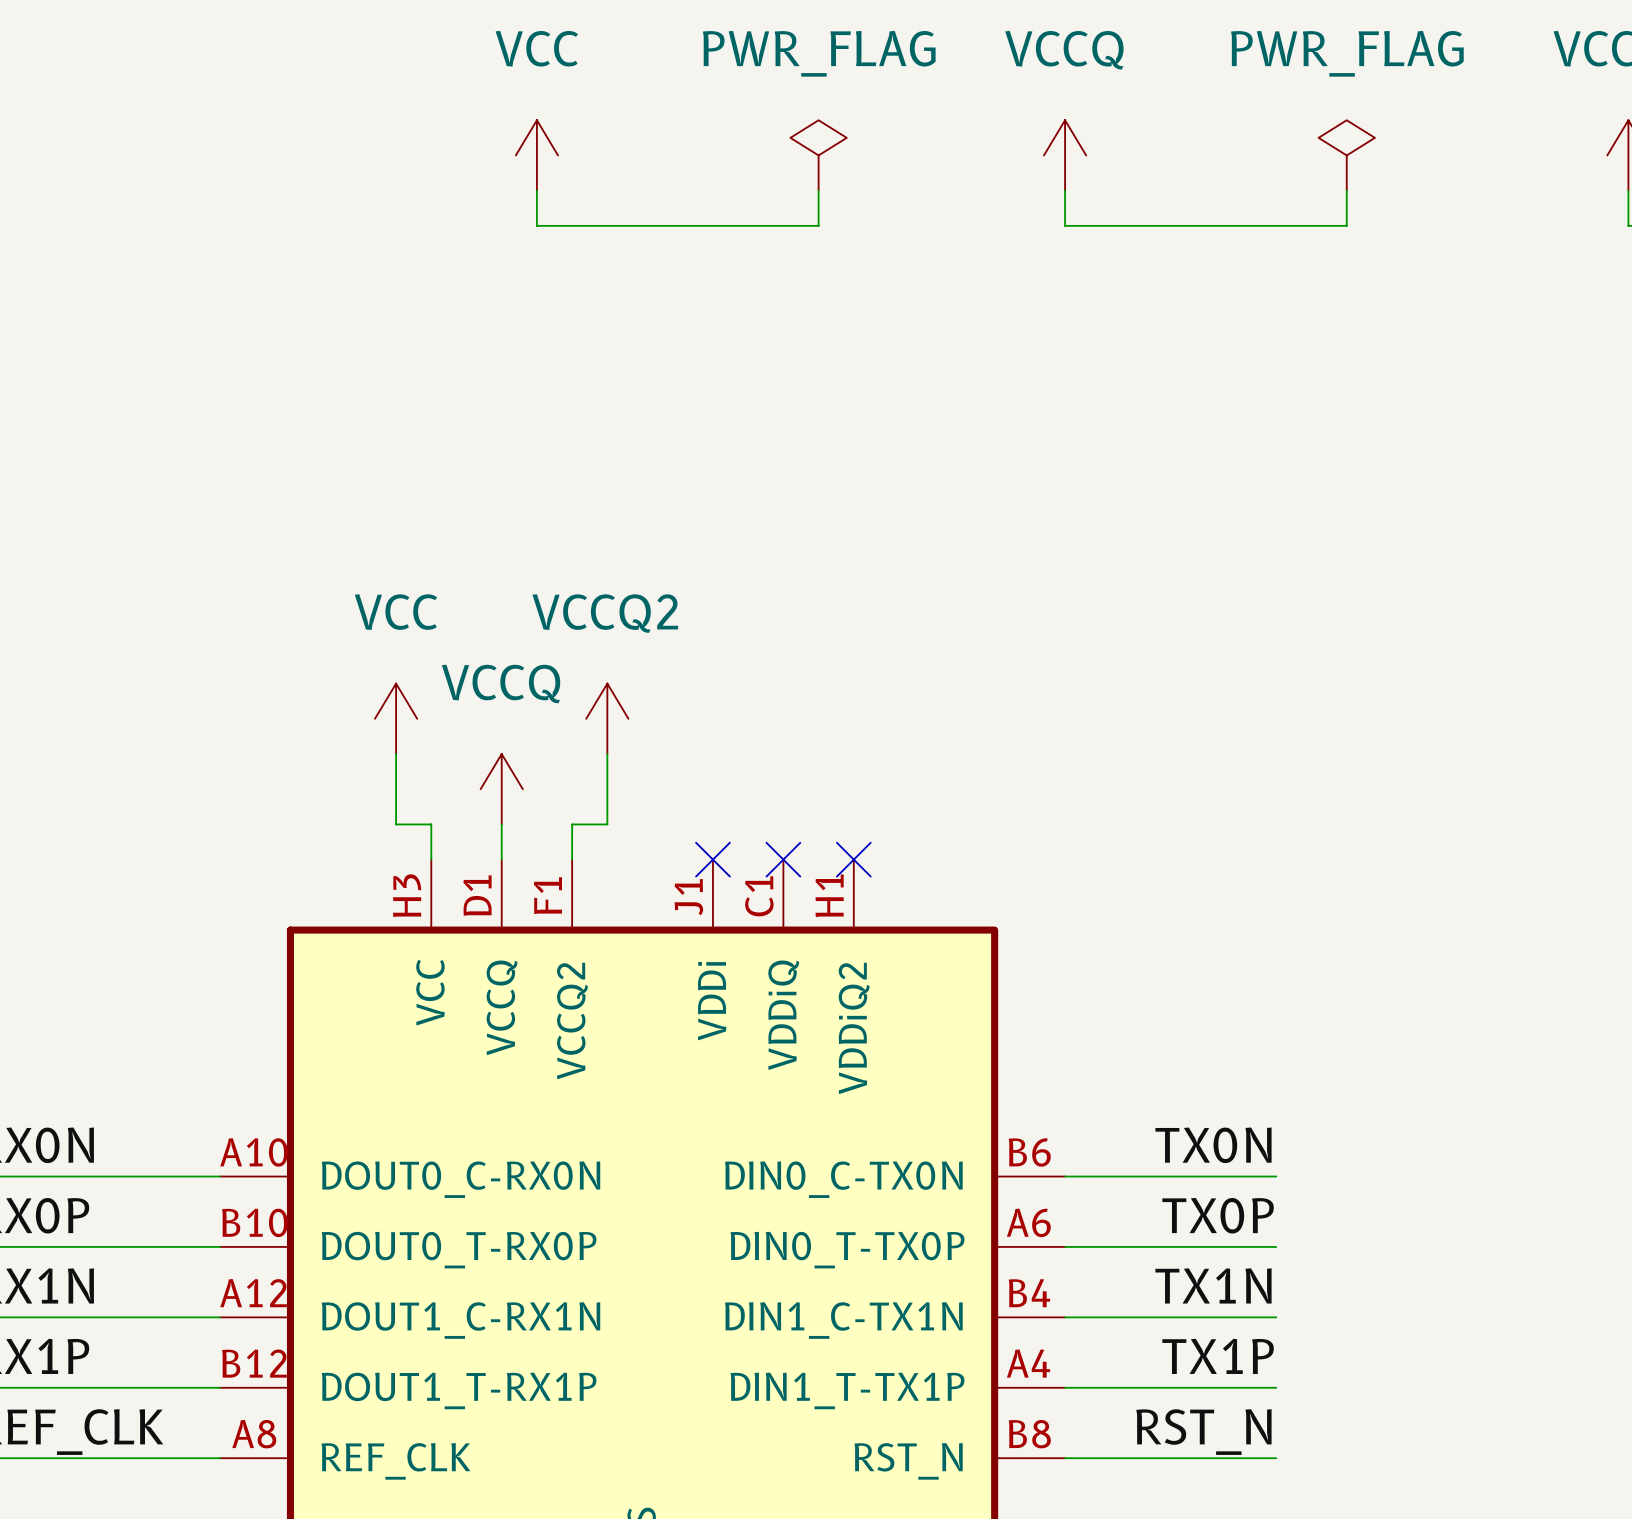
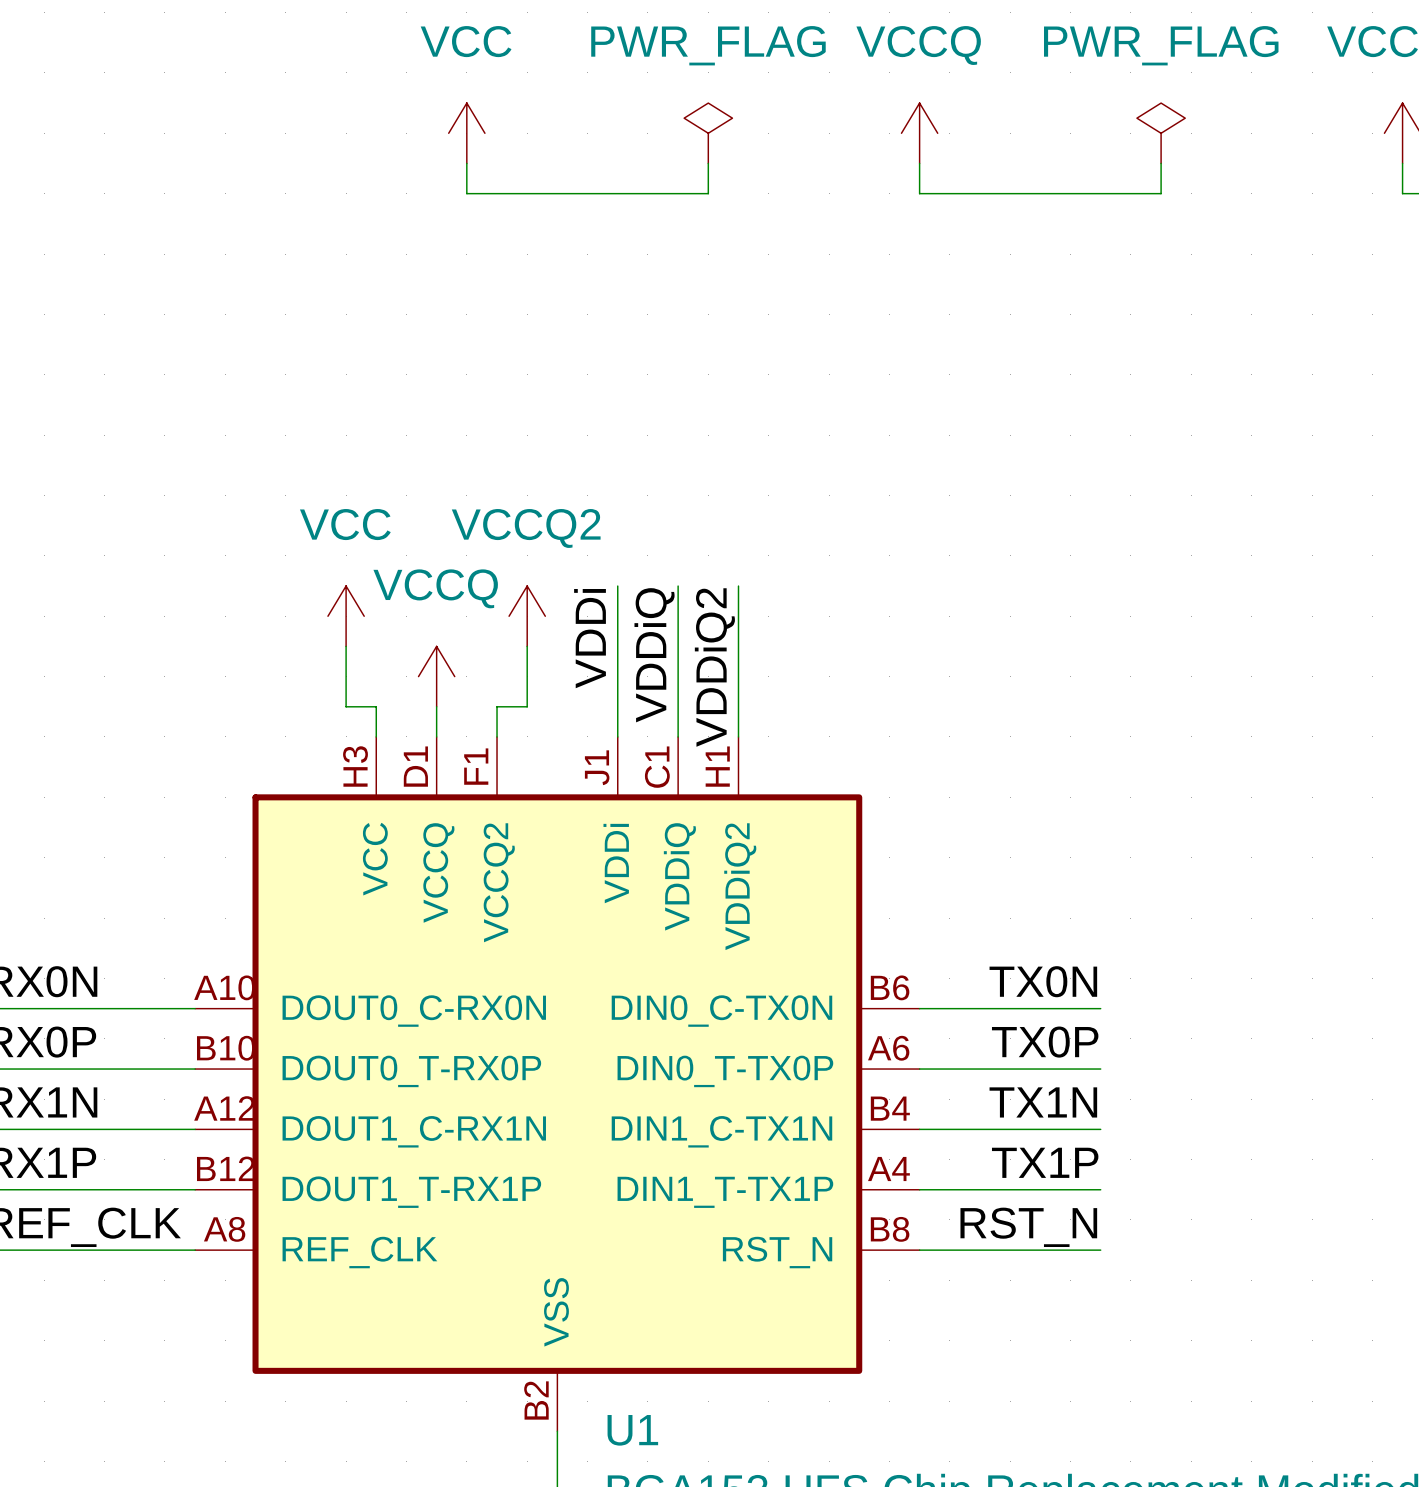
wire: none -> (617, 586) (617, 736)
wire: none -> (678, 586) (678, 736)
wire: none -> (738, 586) (738, 736)
label: none -> VDDi (590, 638)
label: none -> VDDiQ (654, 655)
label: none -> VDDiQ2 (714, 667)
no-connect mark: (712, 859) -> none
no-connect mark: (783, 859) -> none
no-connect mark: (853, 859) -> none

